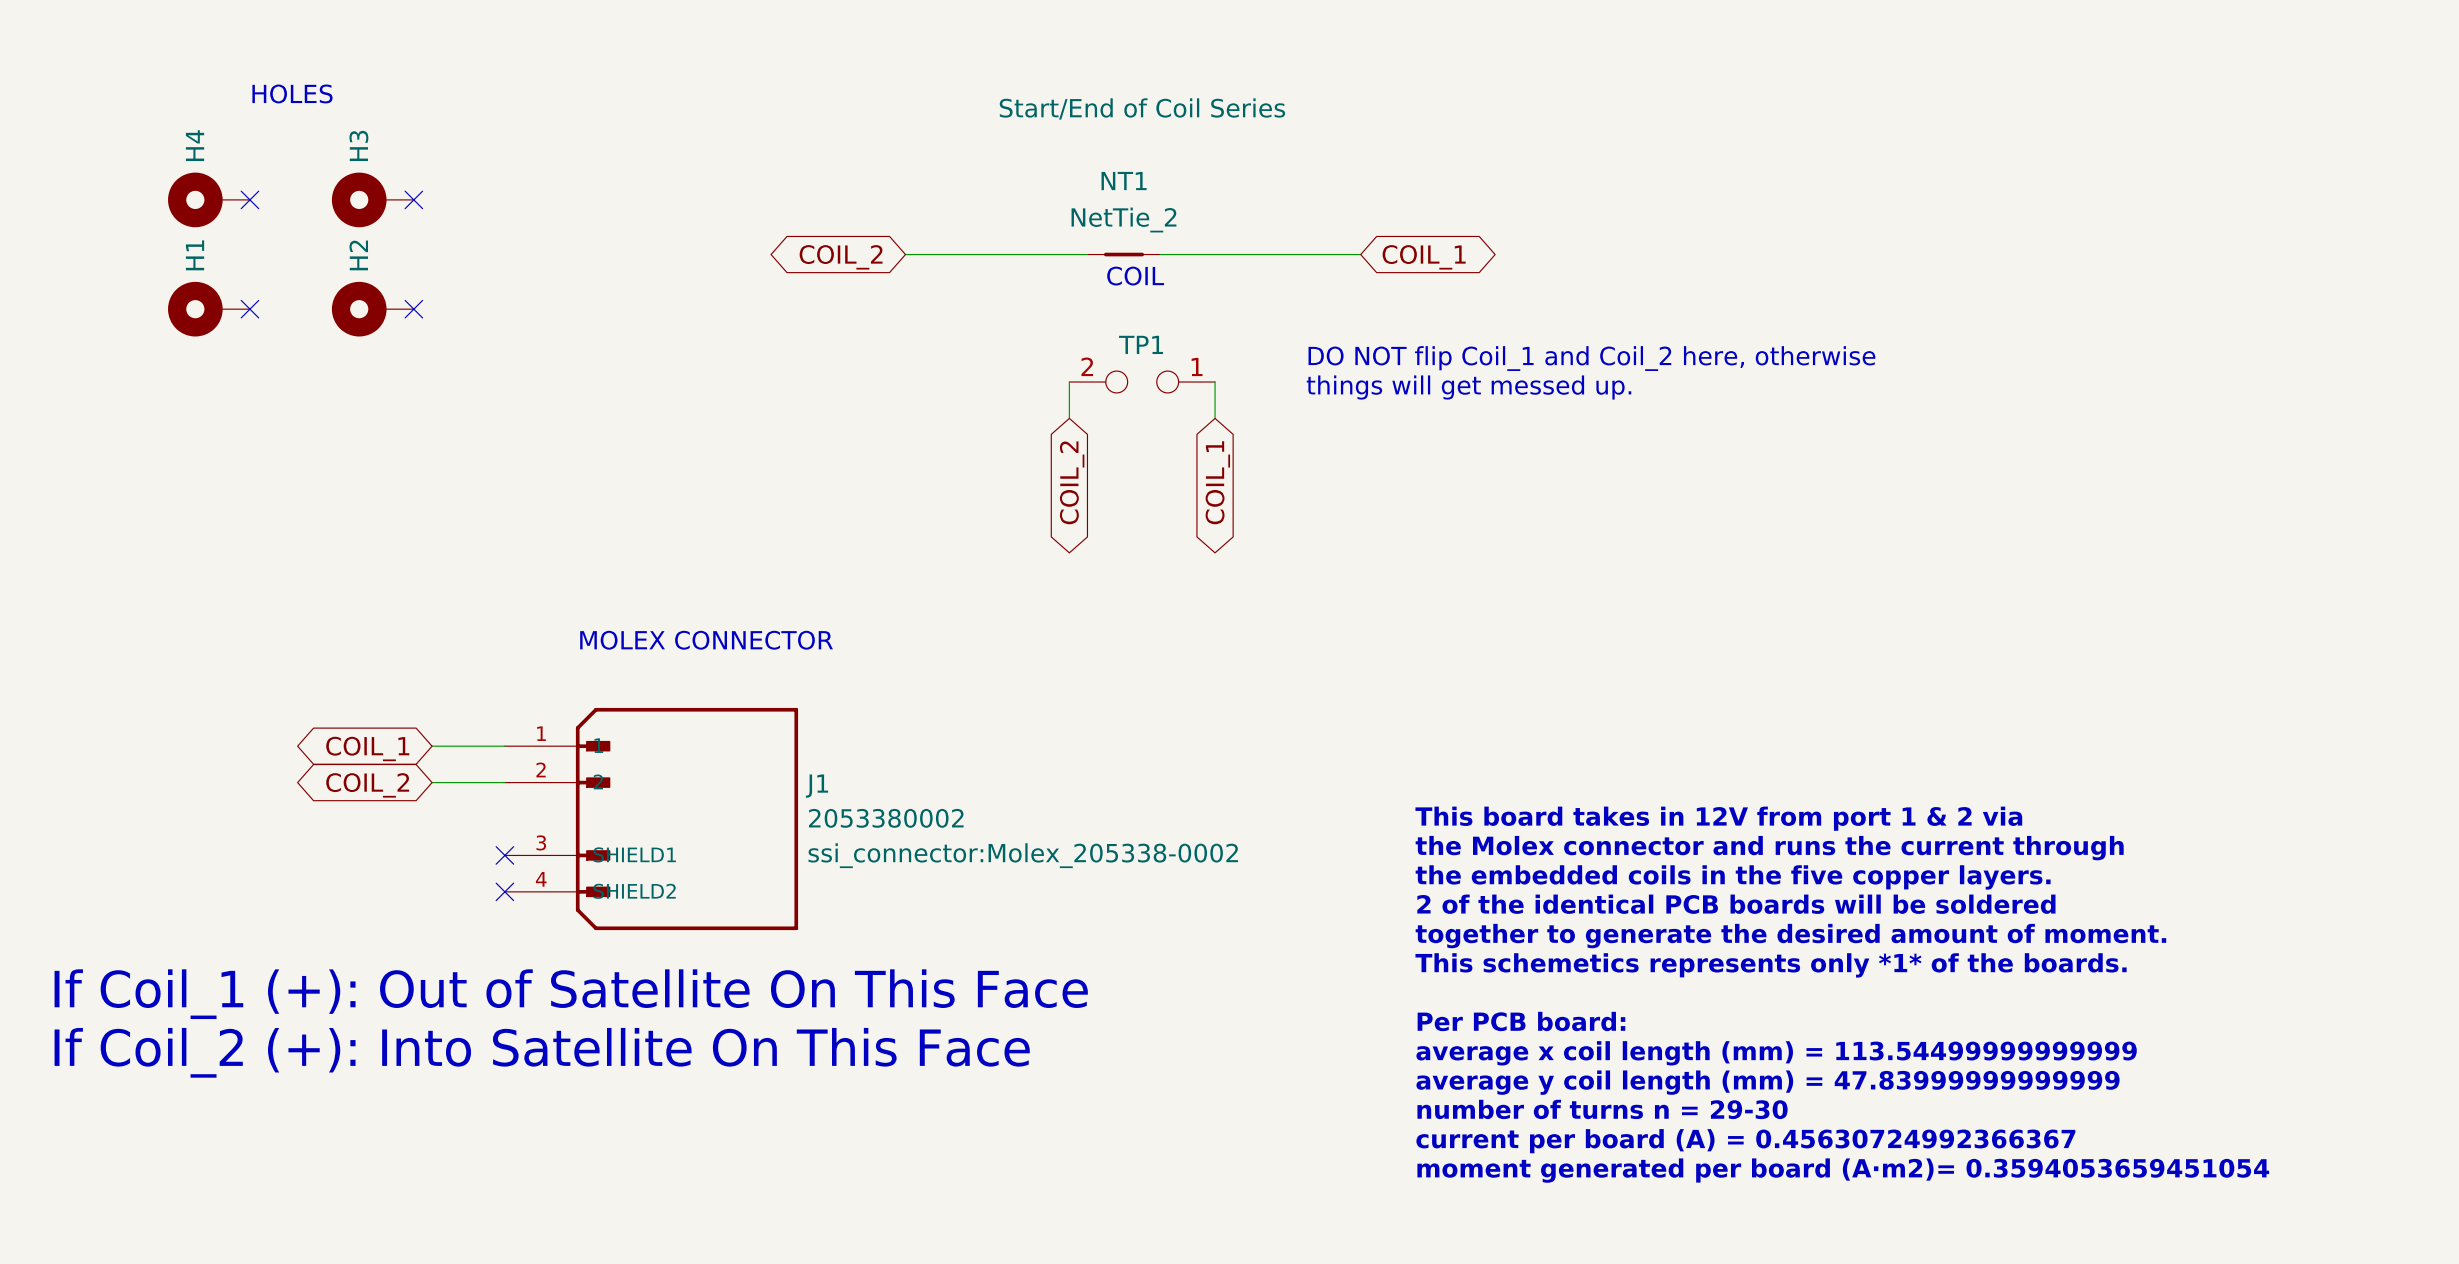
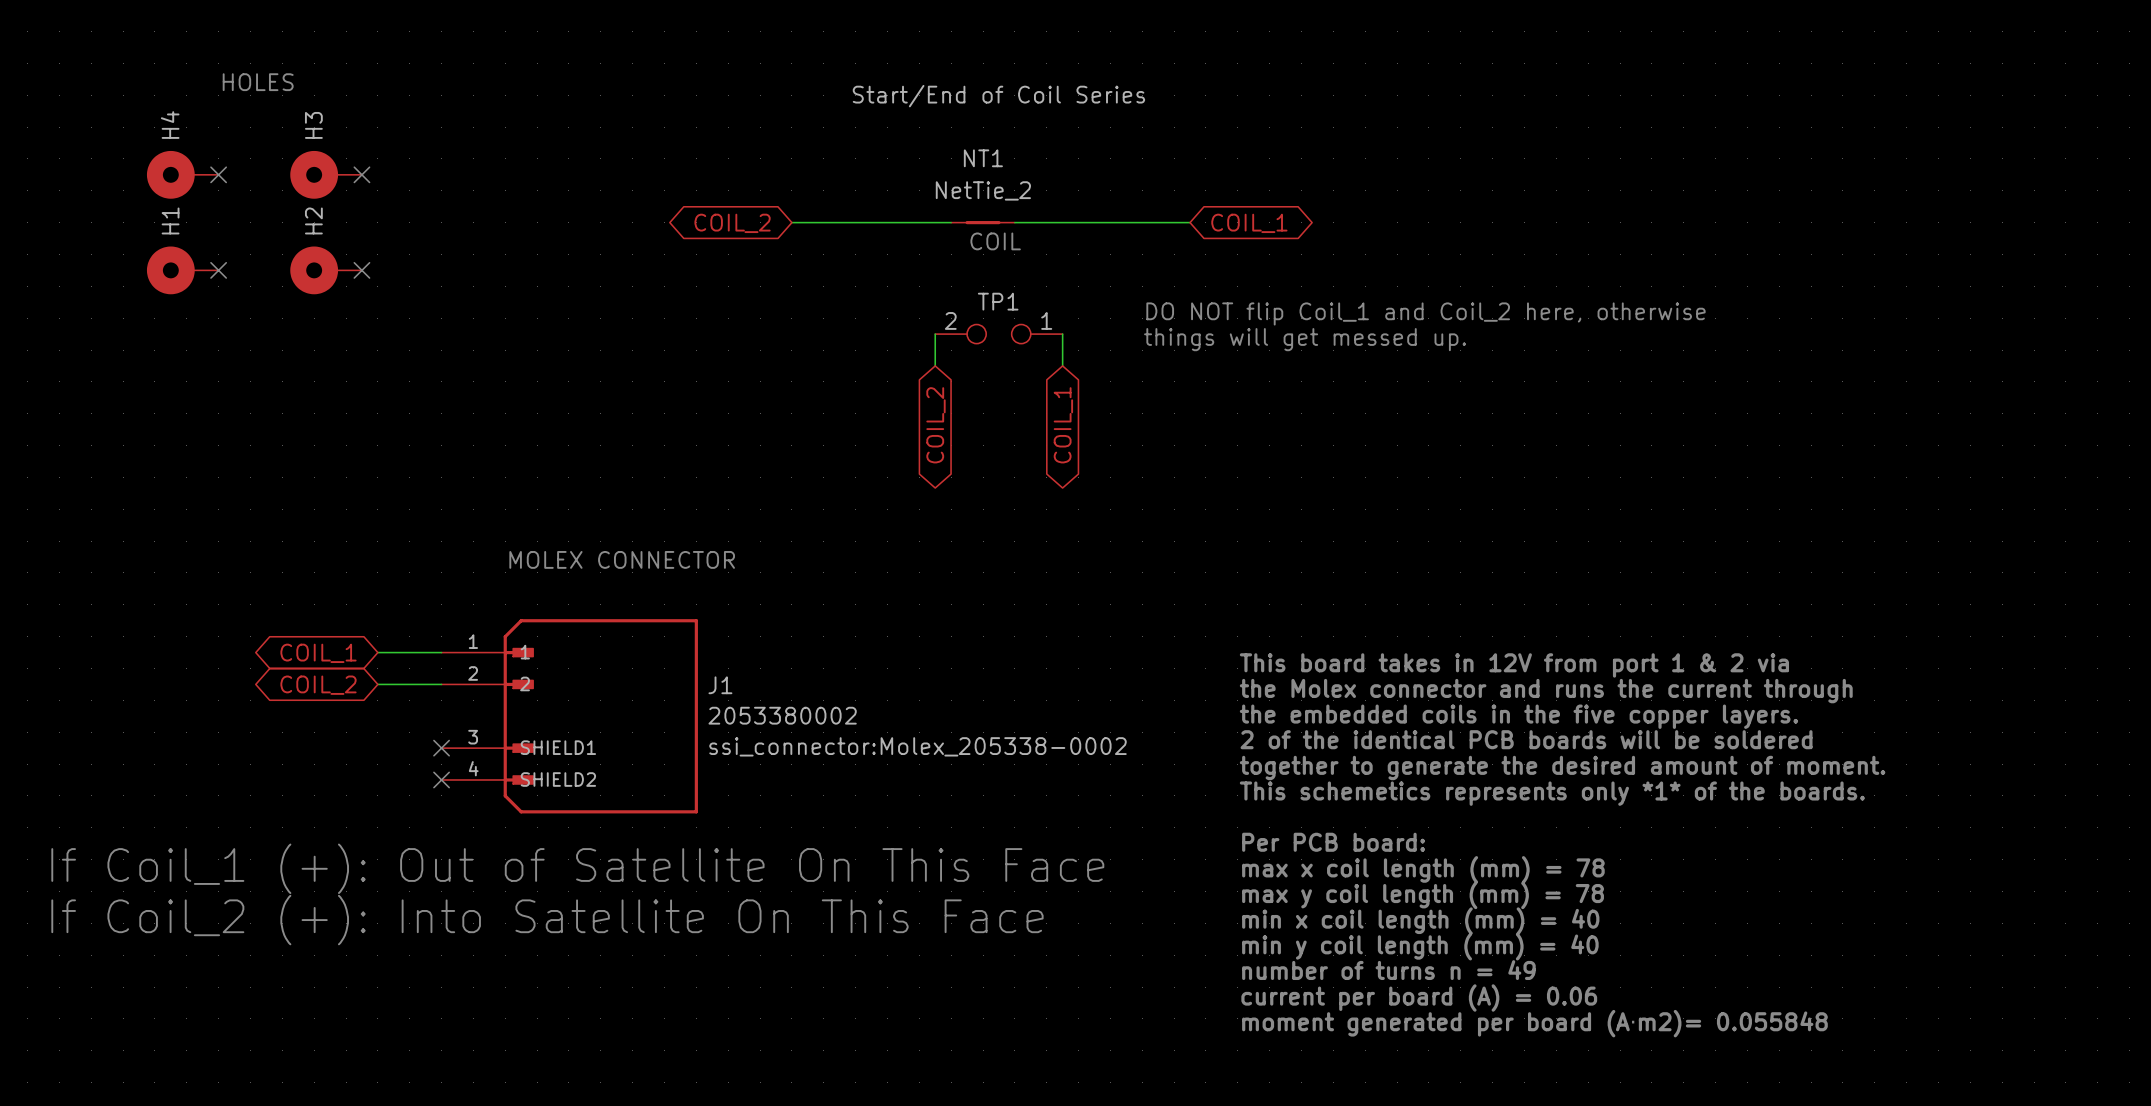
text: none -> This board takes in 12V from port 1 & 2 via (1514, 665)
text: none -> the Molex connector and runs the current through (1546, 691)
text: This board takes in 12V from port 1 & 2 via (1718, 818) -> the embedded coils in the five copper layers. (1518, 716)
text: the Molex connector and runs the current through (1769, 848) -> 2 of the identical PCB boards will be soldered (1526, 739)
text: the embedded coils in the five copper layers. (1733, 877) -> together to generate the desired amount of moment. (1562, 768)
text: 2 of the identical PCB boards will be soldered (1736, 904) -> This schemetics represents only *1* of the boards. (1552, 793)
text: together to generate the desired amount of moment. (1790, 936) -> none
text: This schemetics represents only *1* of the boards. (1771, 965) -> Per PCB board: (1333, 842)
text: none -> max x coil length (mm) = 78 (1423, 869)
text: Per PCB board: (1521, 1021) -> max y coil length (mm) = 78 (1423, 895)
text: average x coil length (mm) = 113.54499999999999 (1776, 1053) -> min x coil length (mm) = 40 (1420, 921)
text: average y coil length (mm) = 47.83999999999999 (1767, 1082) -> min y coil length (mm) = 40 (1420, 946)
text: number of turns n = 29-30 (1602, 1109) -> number of turns n = 49 (1388, 970)
text: current per board (A) = 0.45630724992366367 (1745, 1141) -> current per board (A) = 0.06 (1419, 997)
text: moment generated per board (A⋅m2)= 0.3594053659451054 (1843, 1170) -> moment generated per board (A⋅m2)= 0.055848 (1534, 1023)

